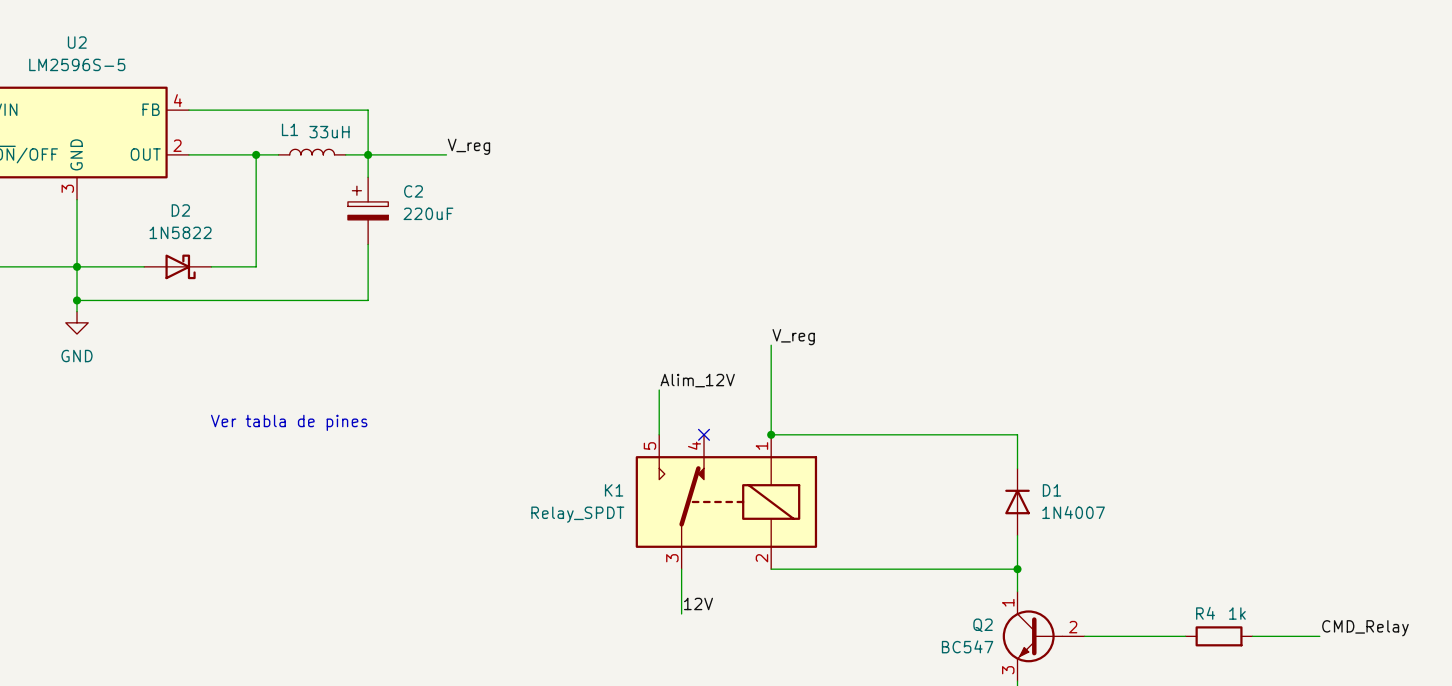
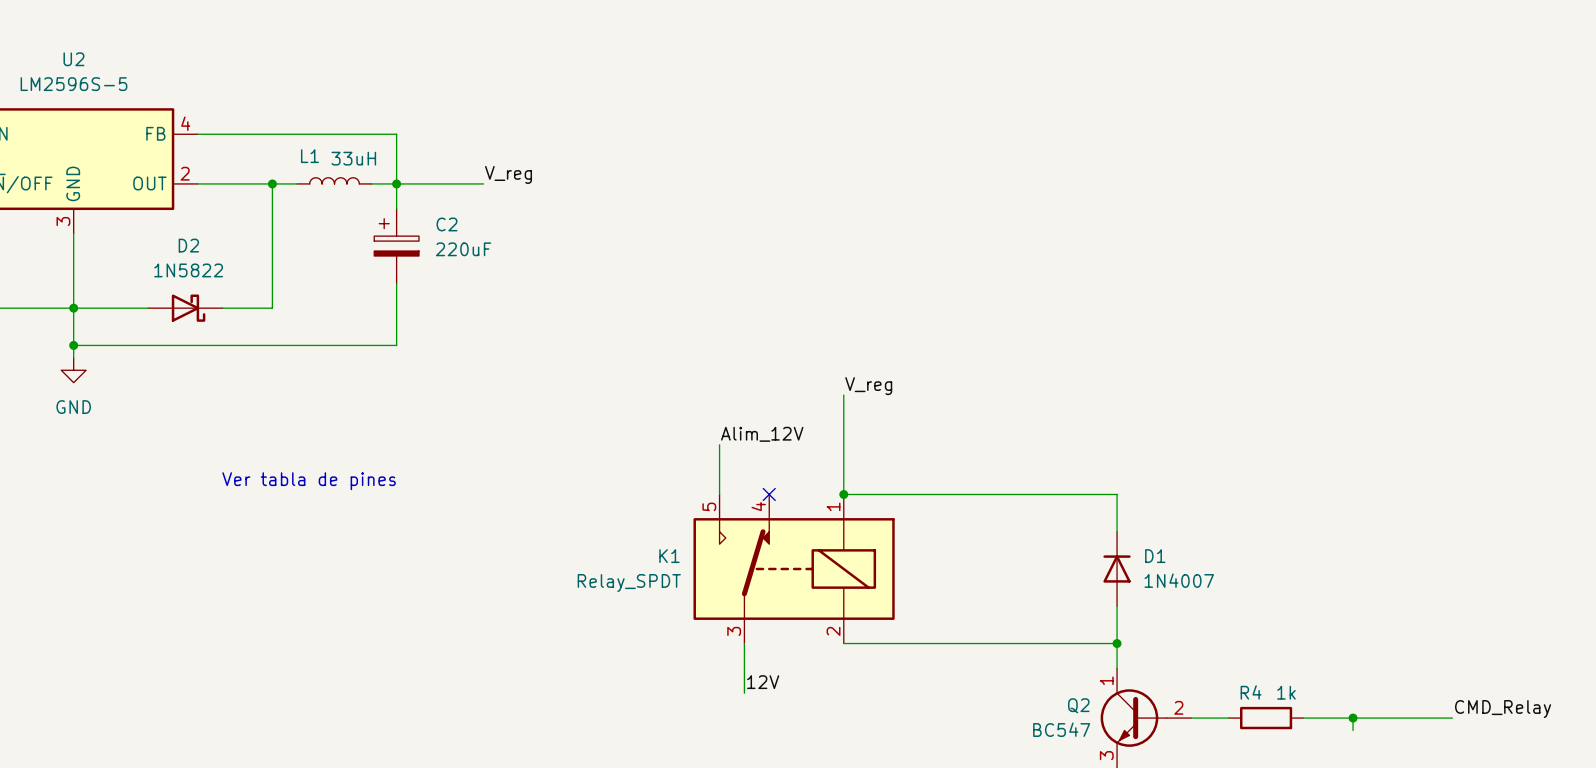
wire: (1118, 636) (1185, 636) -> (1377, 718) (1303, 718)
R4 position: (1219, 636) -> (1266, 718)
wire: none -> (1353, 718) (1353, 730)
junction: none -> (1353, 718)

